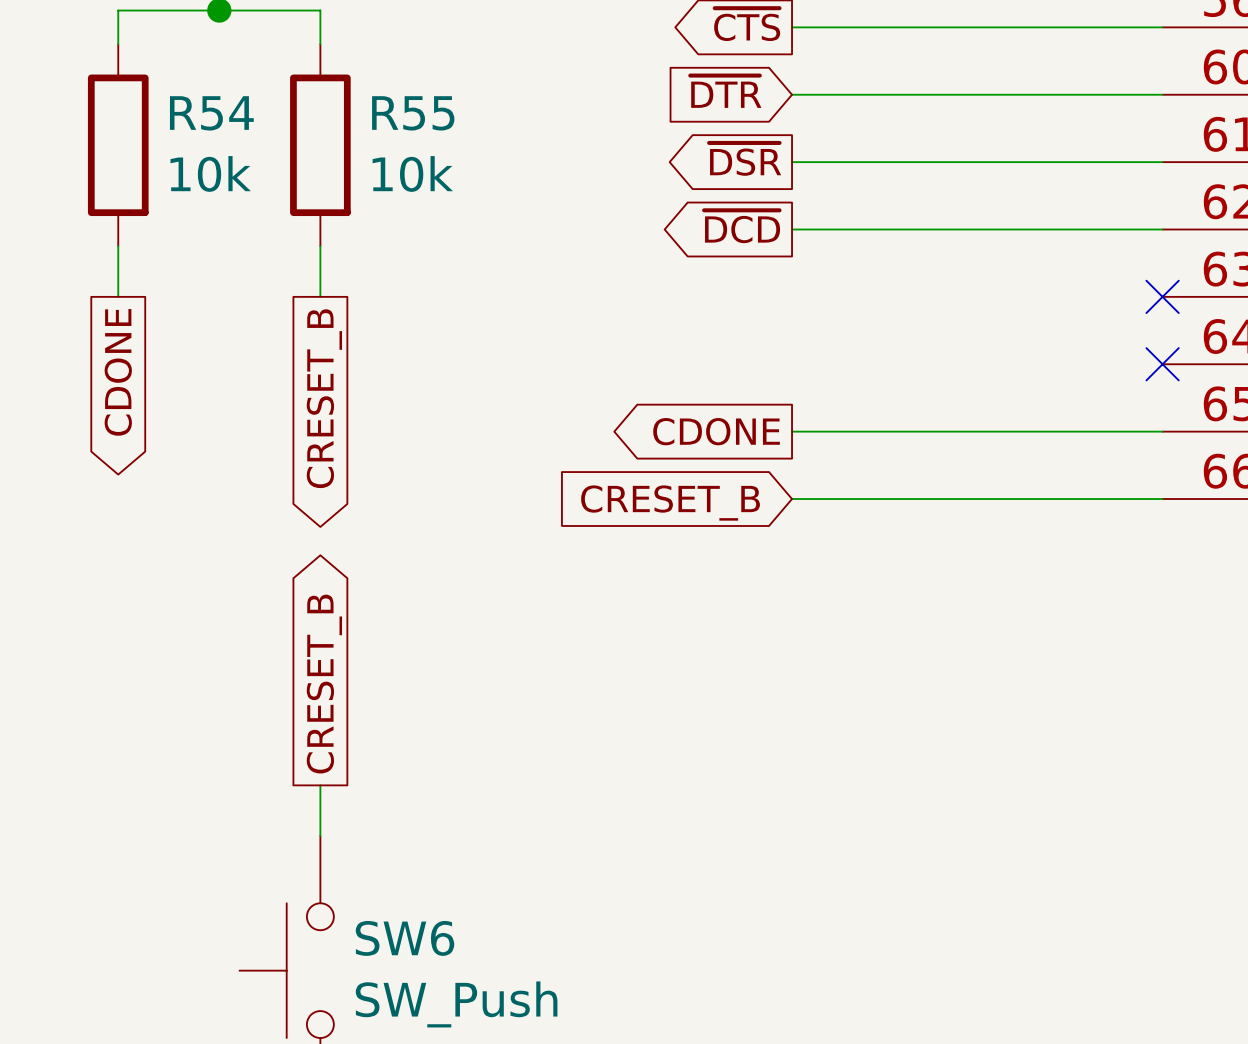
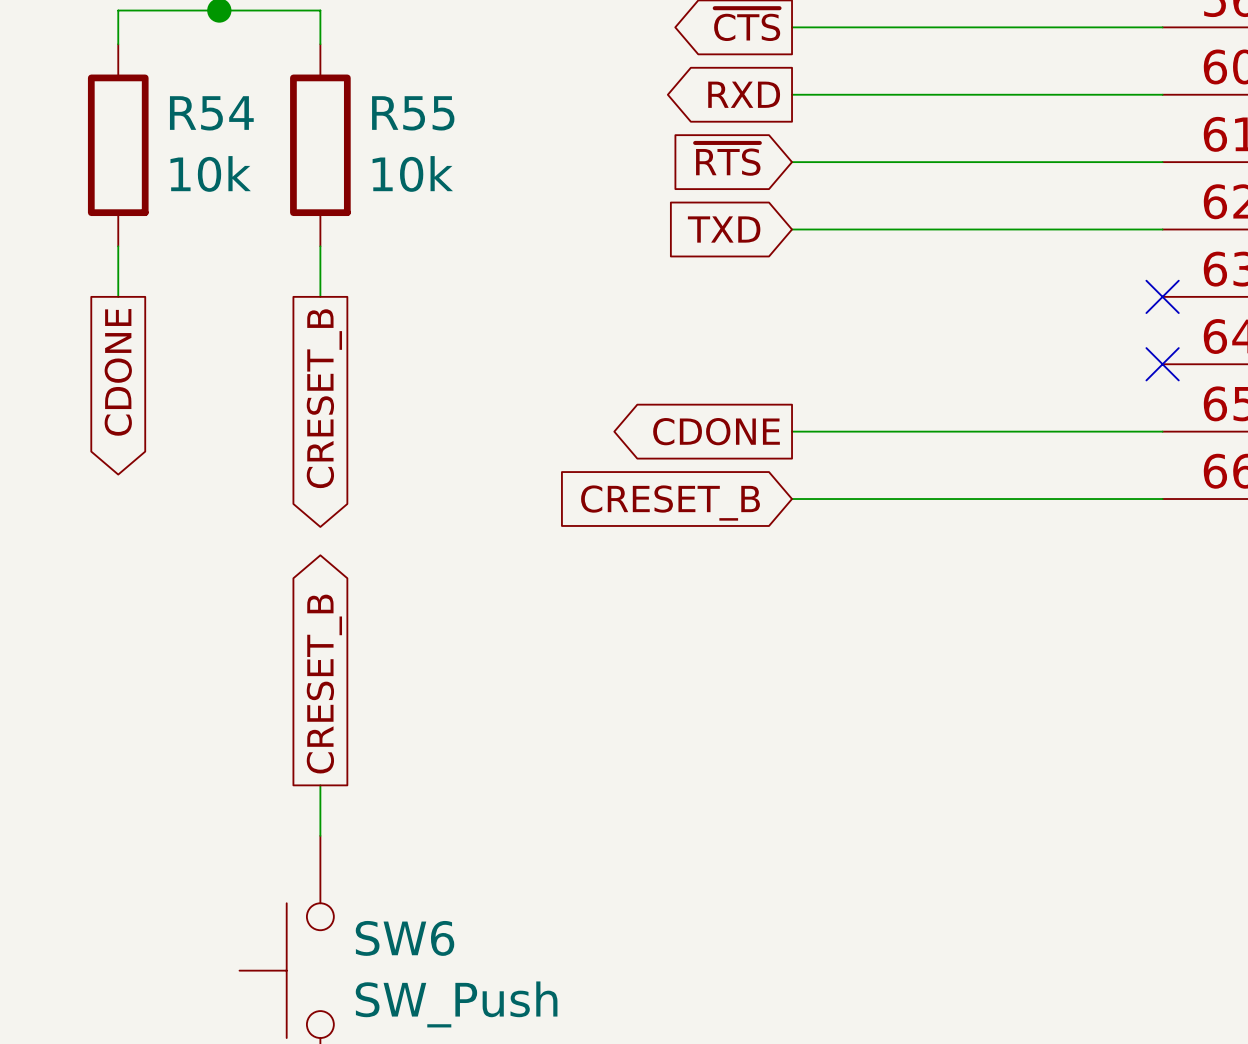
global label shape: input (725, 91) -> output (744, 94)
global label: ~{DTR} (725, 91) -> RXD (744, 94)
global label shape: output (745, 159) -> input (727, 159)
global label: ~{DSR} (745, 159) -> ~{RTS} (727, 159)
global label shape: output (742, 226) -> input (724, 229)
global label: ~{DCD} (742, 226) -> TXD (724, 229)

